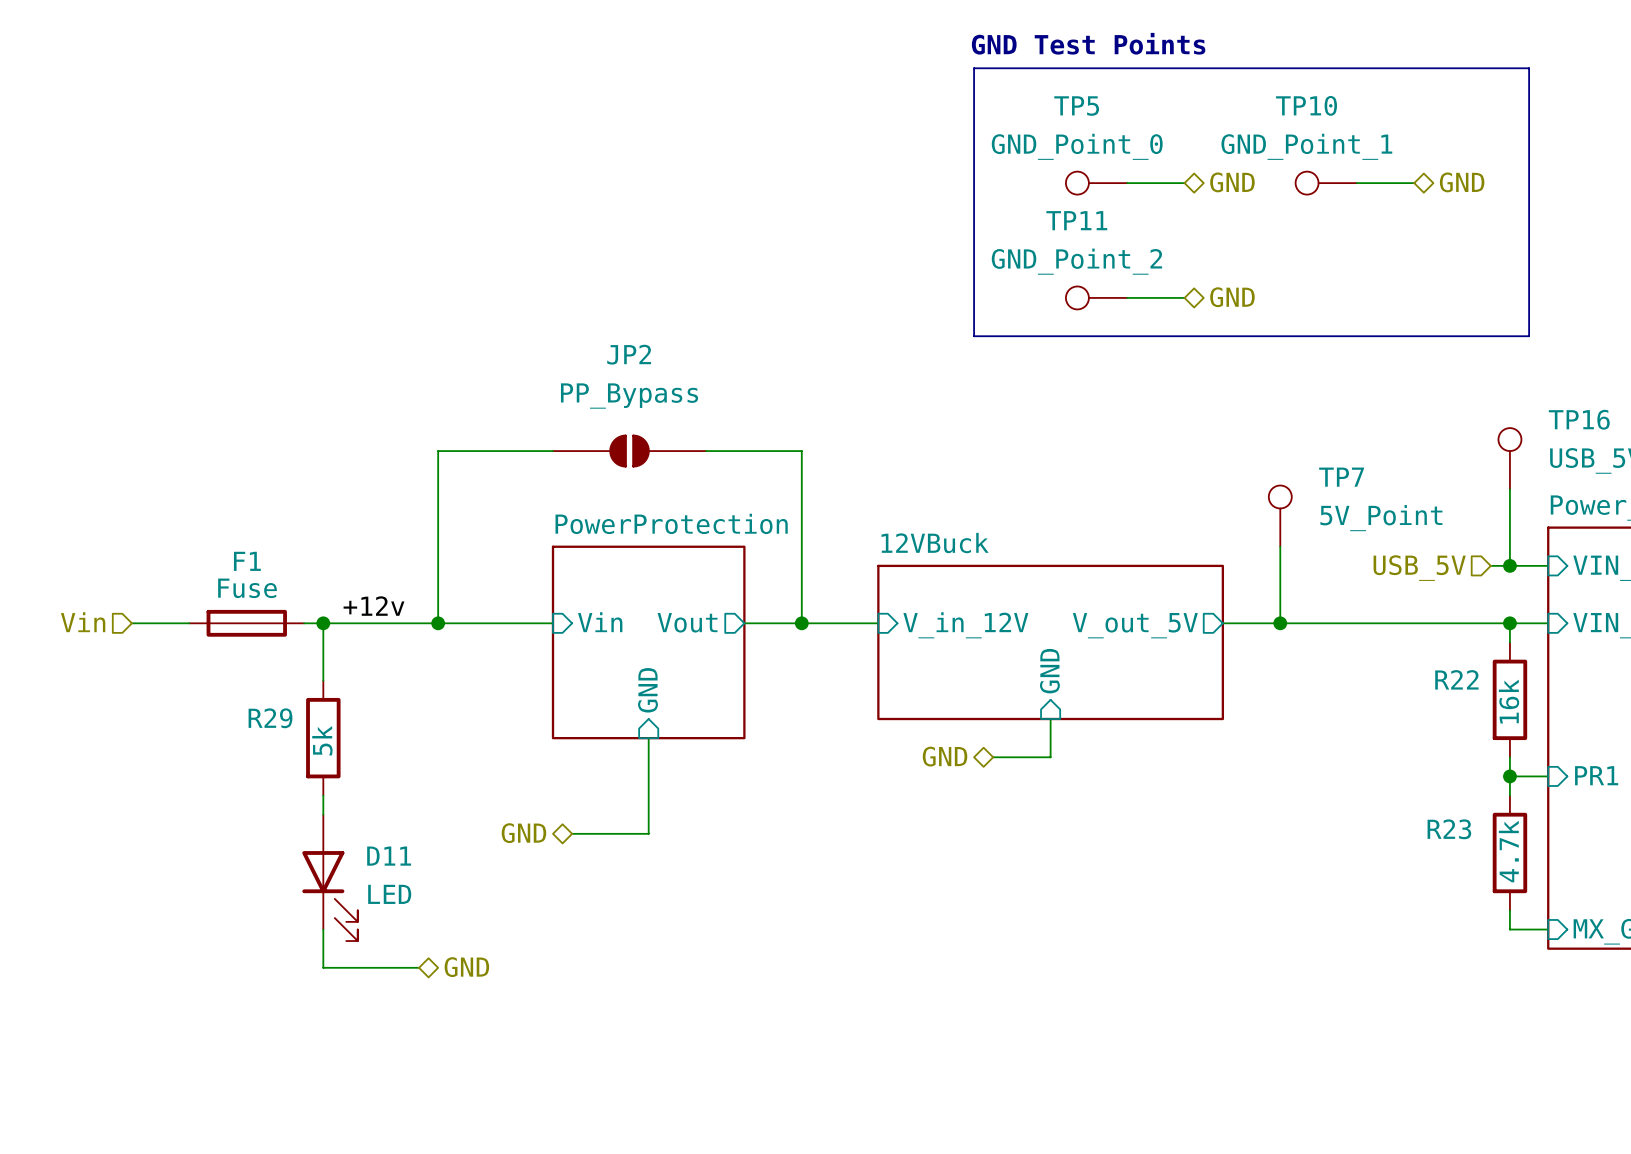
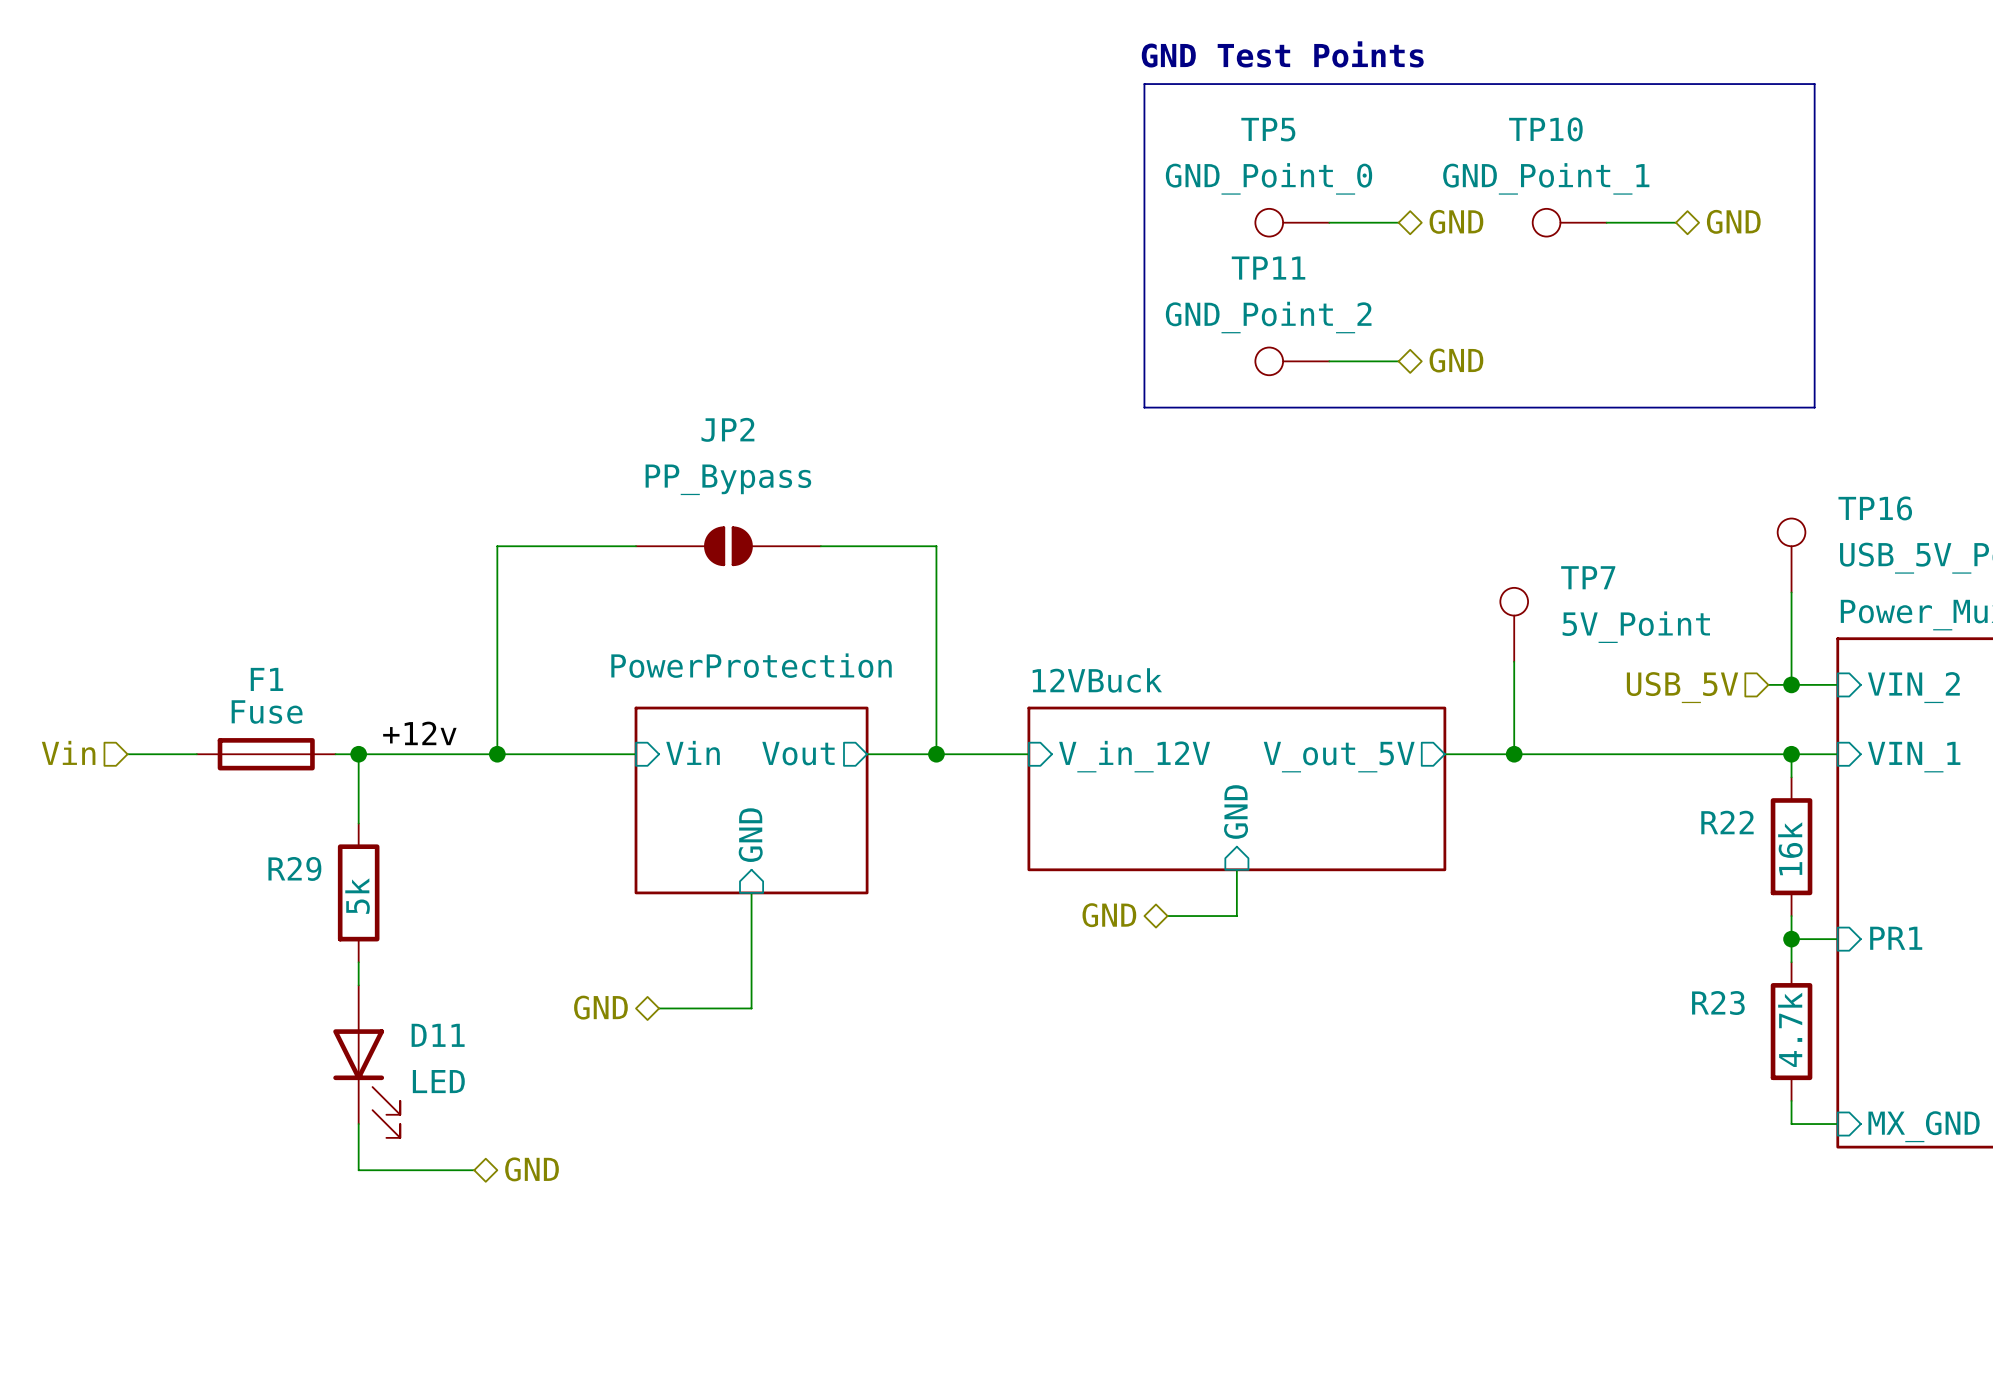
sheet 12VBuck shape: [877, 564, 1225, 721] -> [1027, 706, 1447, 872]
sheet PowerProtection: (648, 642) -> none
sheet PowerProtection: none -> (751, 800)

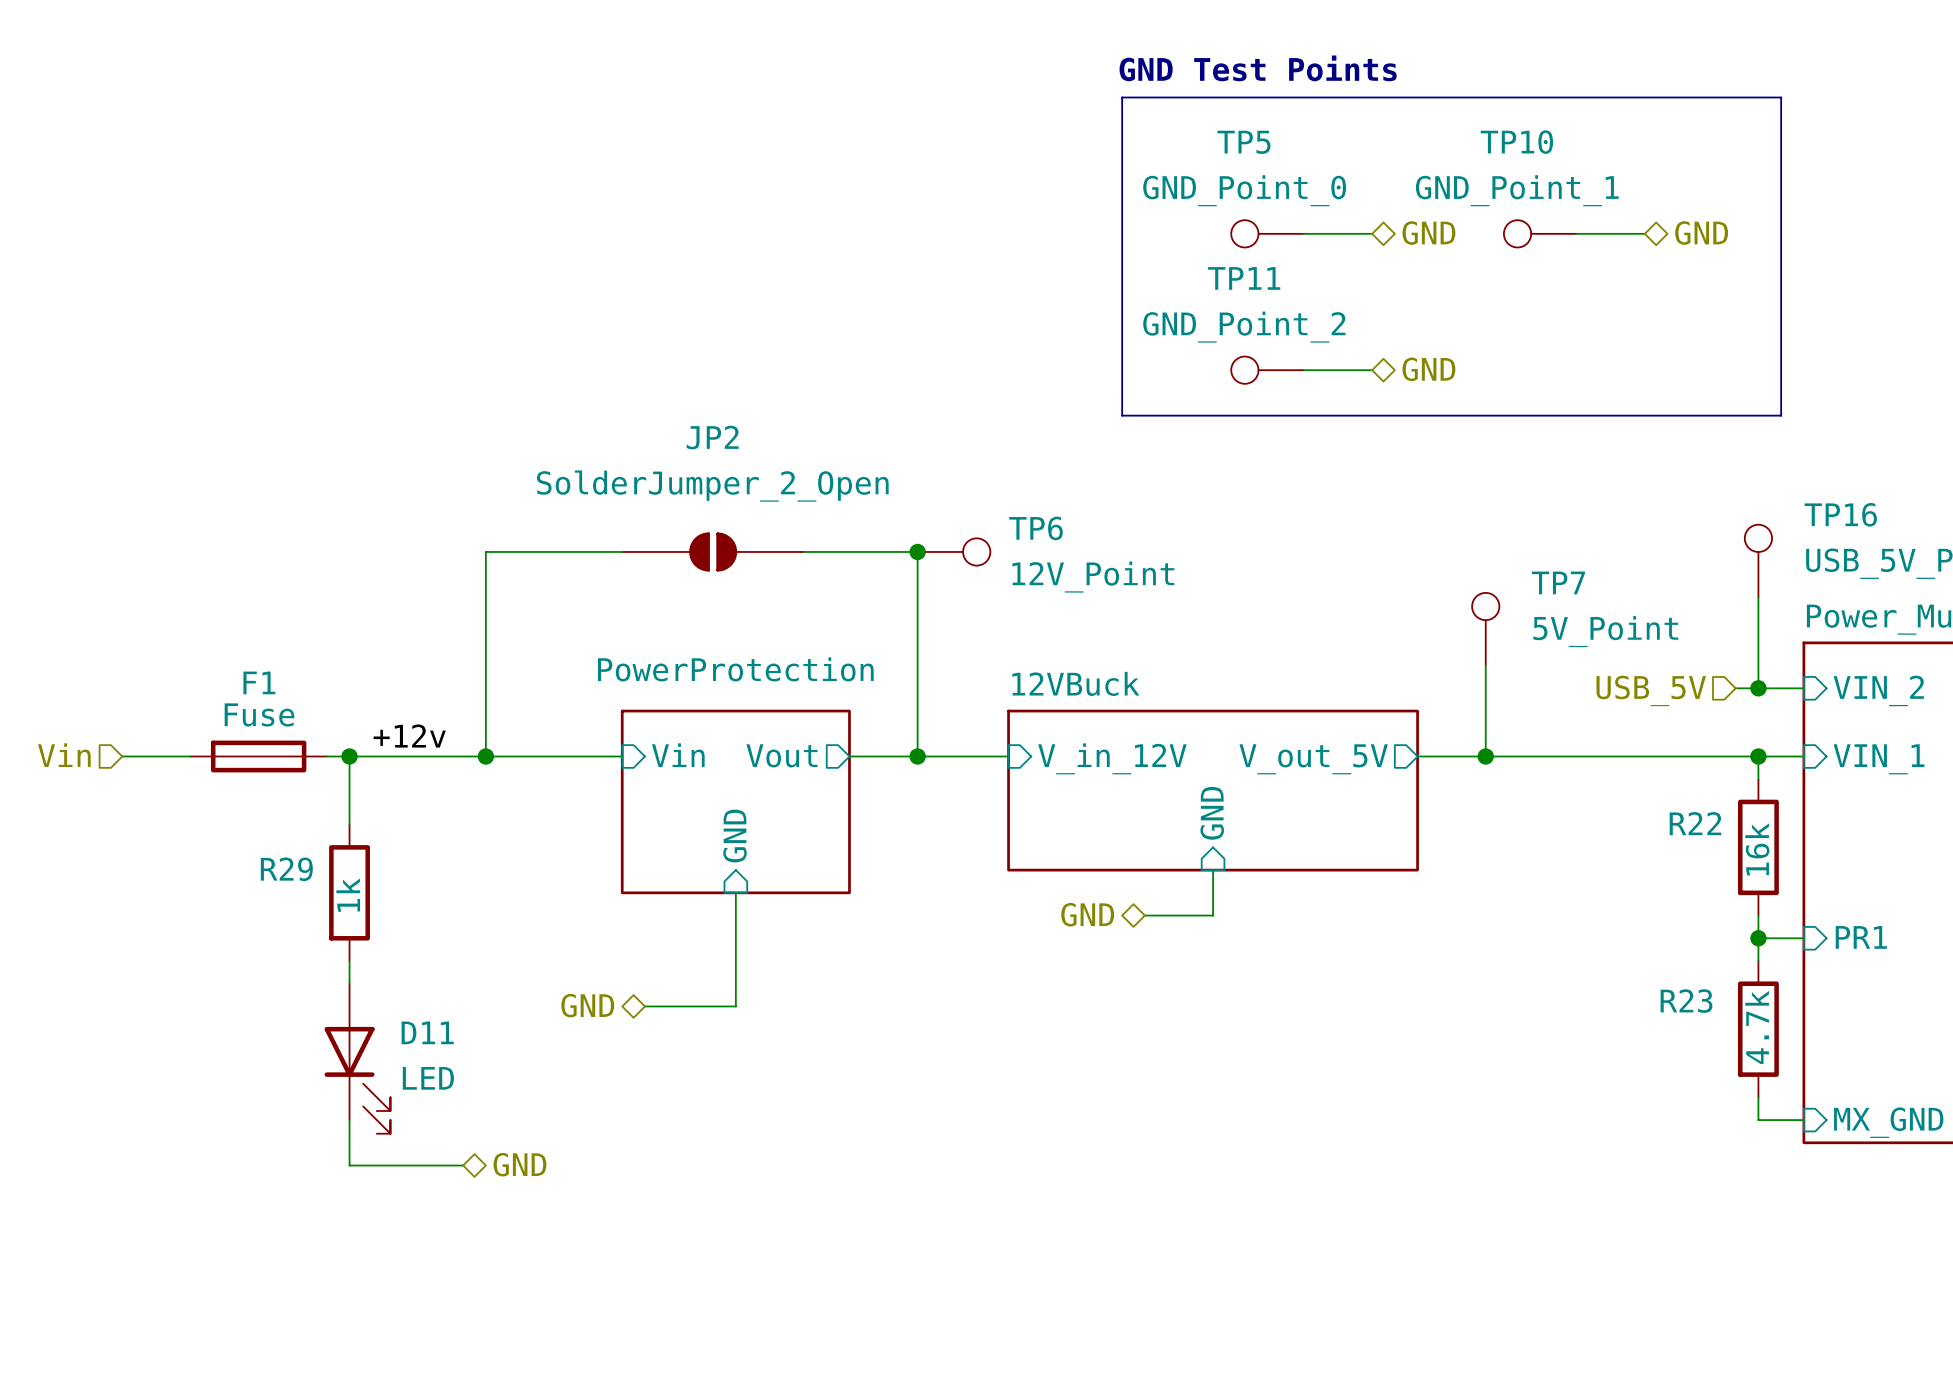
JP2 value: PP_Bypass (728, 479) -> SolderJumper_2_Open (712, 486)
junction: none -> (917, 551)
TP6: none -> 12V_Point (954, 551)
R29 value: 5k (357, 896) -> 1k (348, 895)

